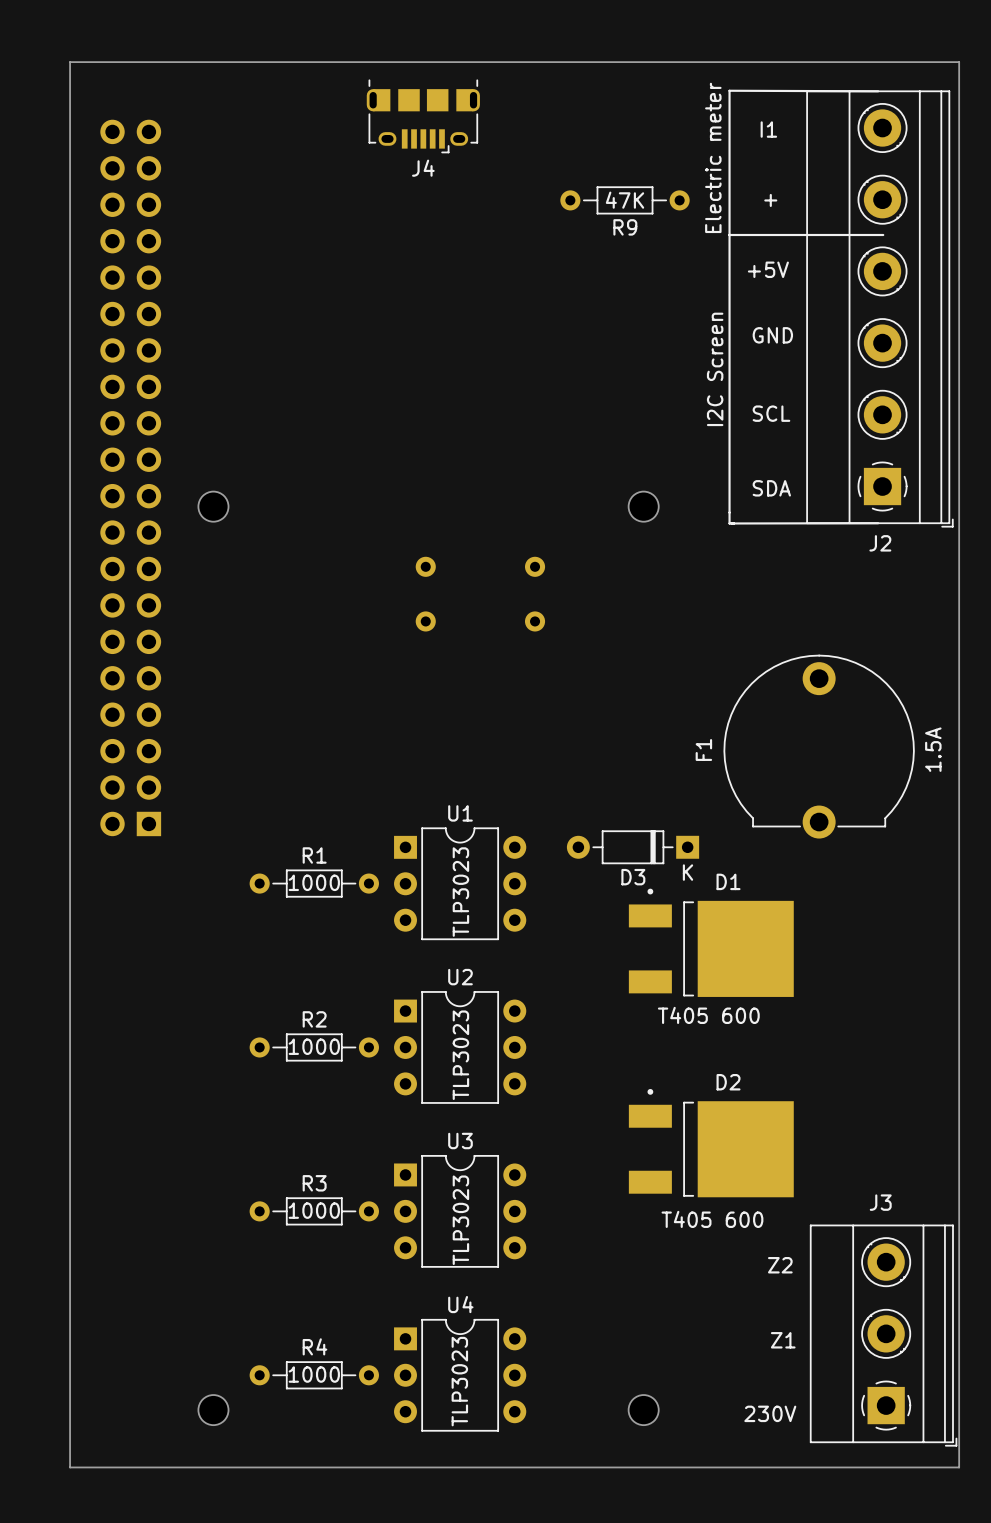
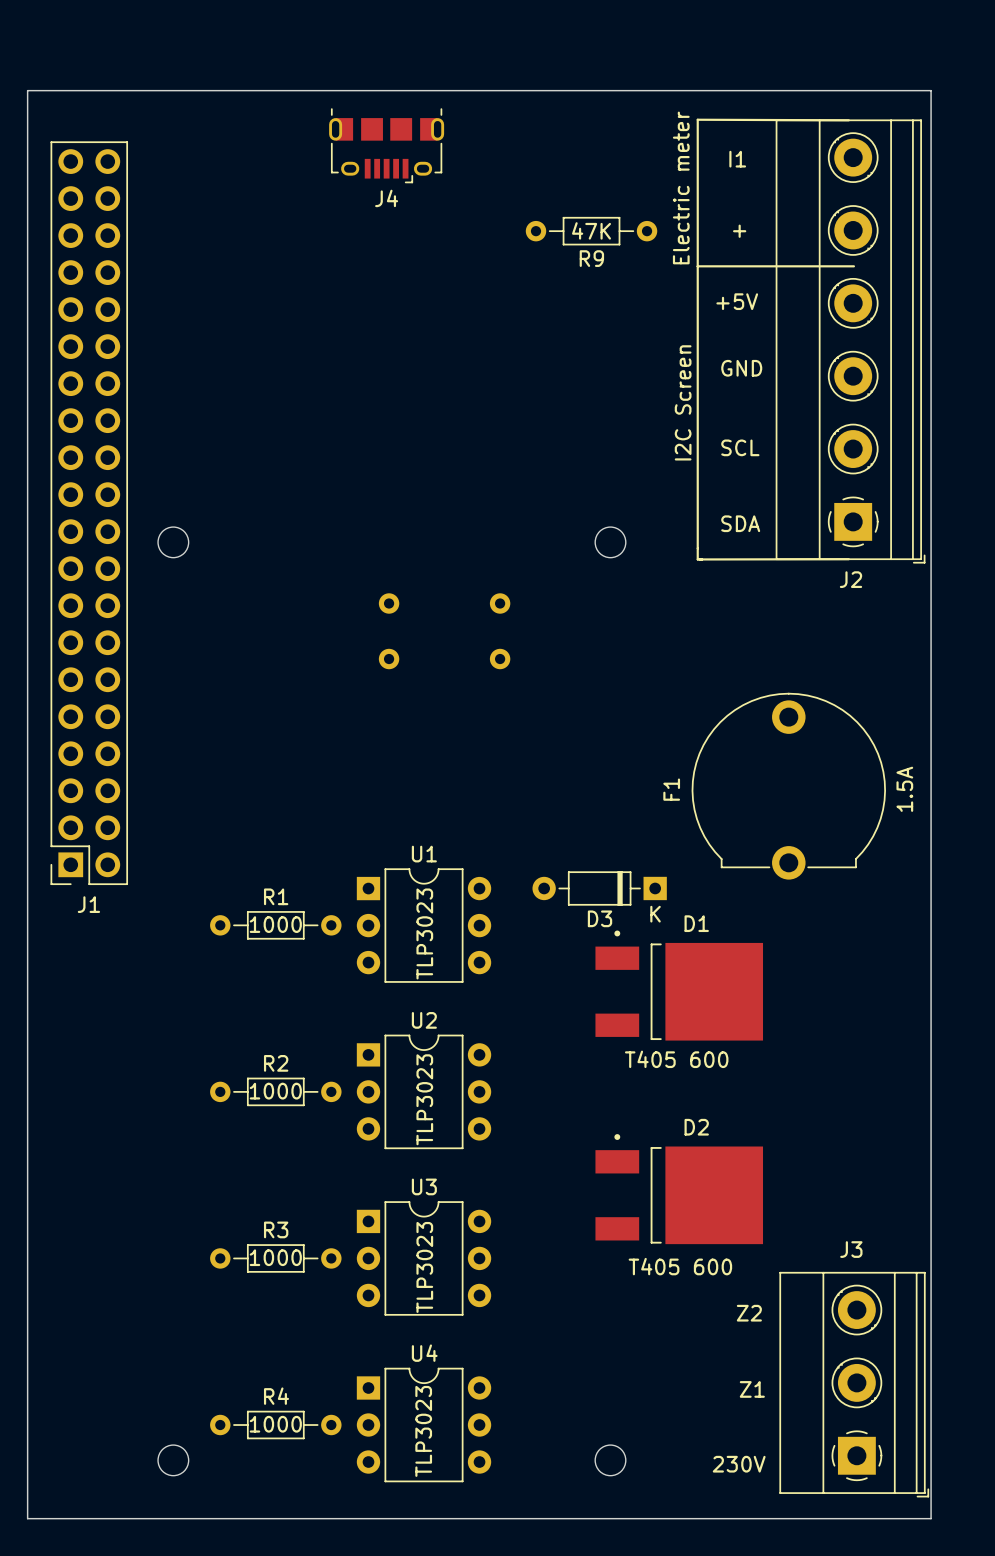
J1 side: bottom (130, 477) -> top (89, 513)

